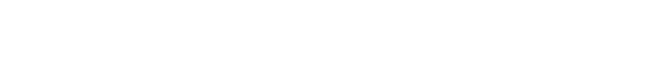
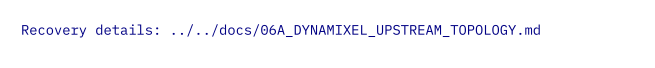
text: none -> Recovery details: ../../docs/06A_DYNAMIXEL_UPSTREAM_TOPOLOGY.md (280, 30)

